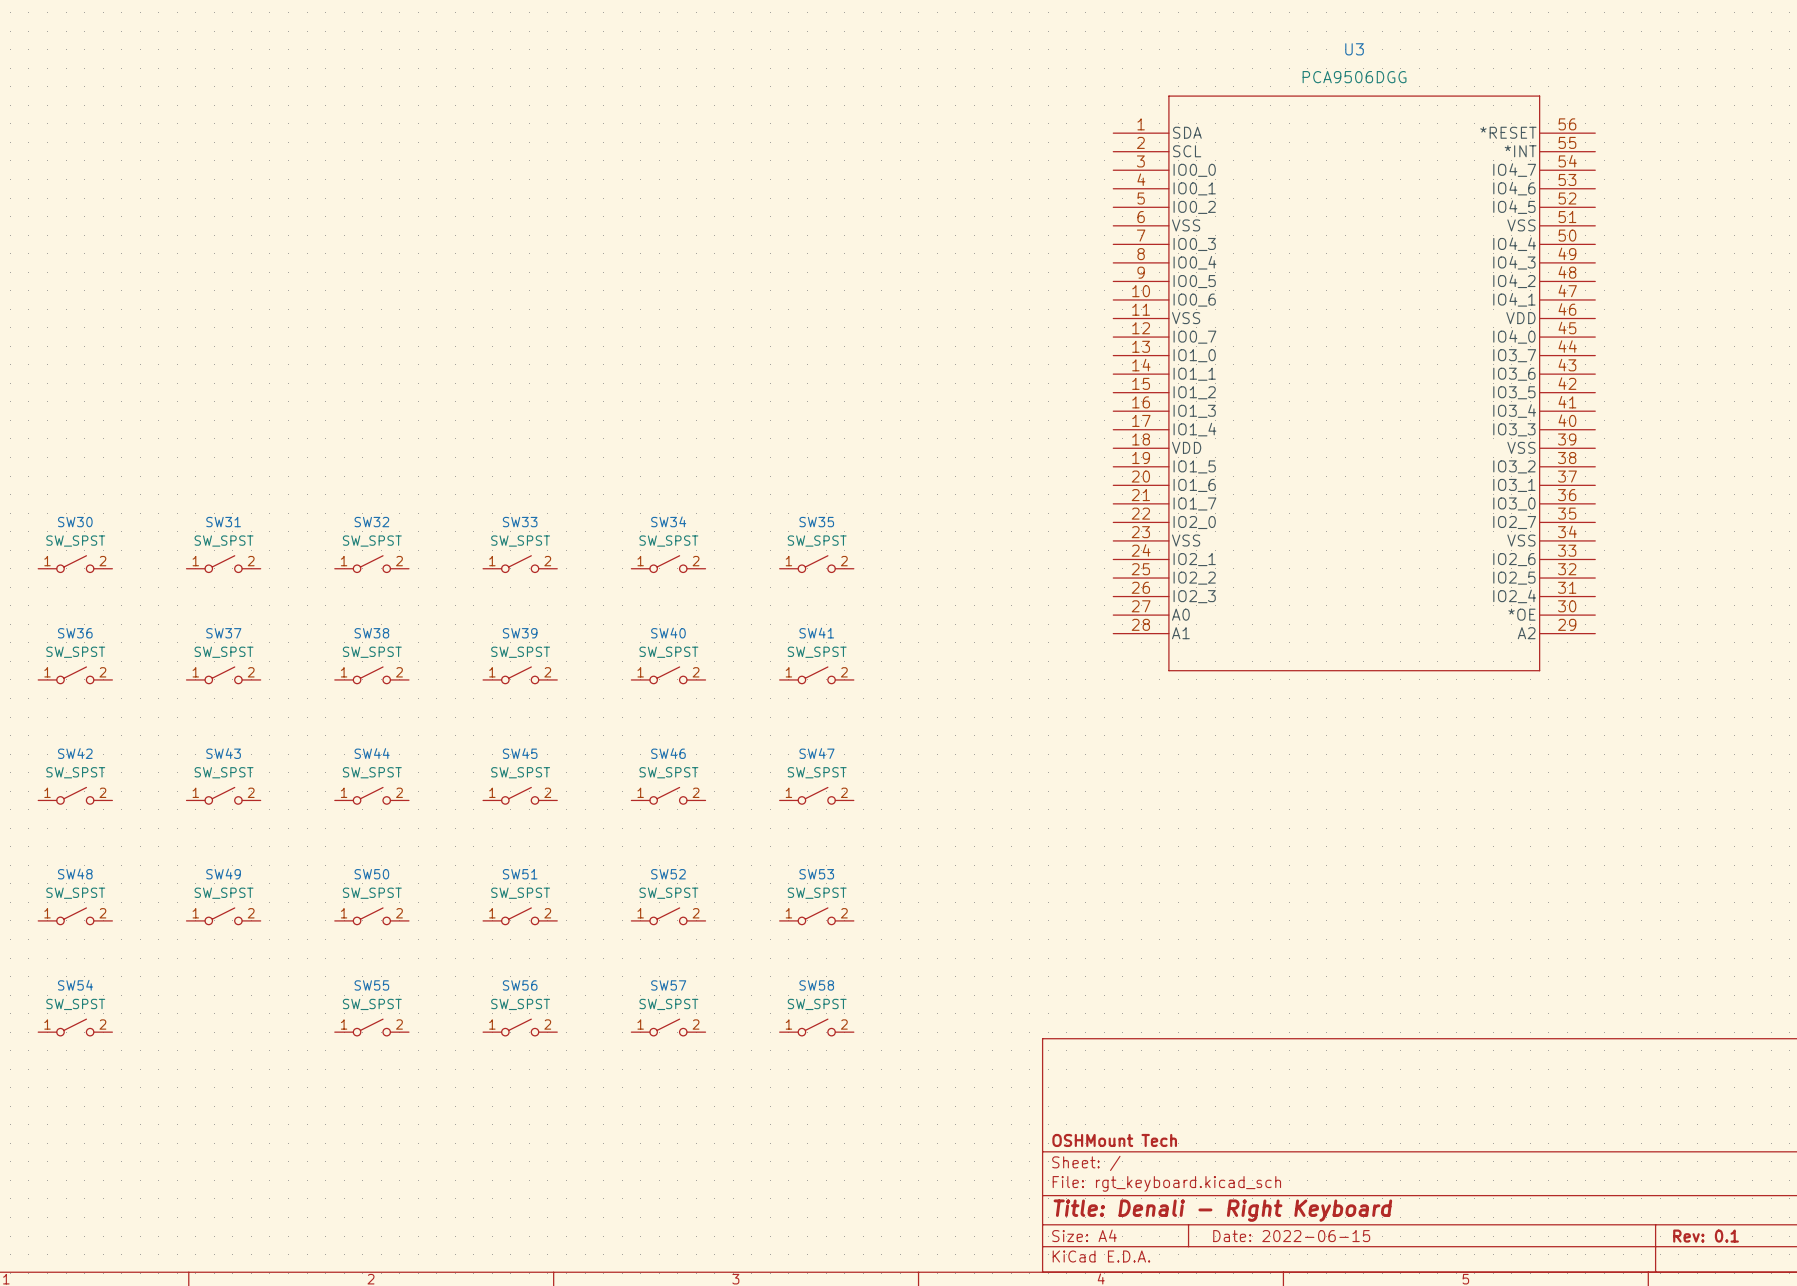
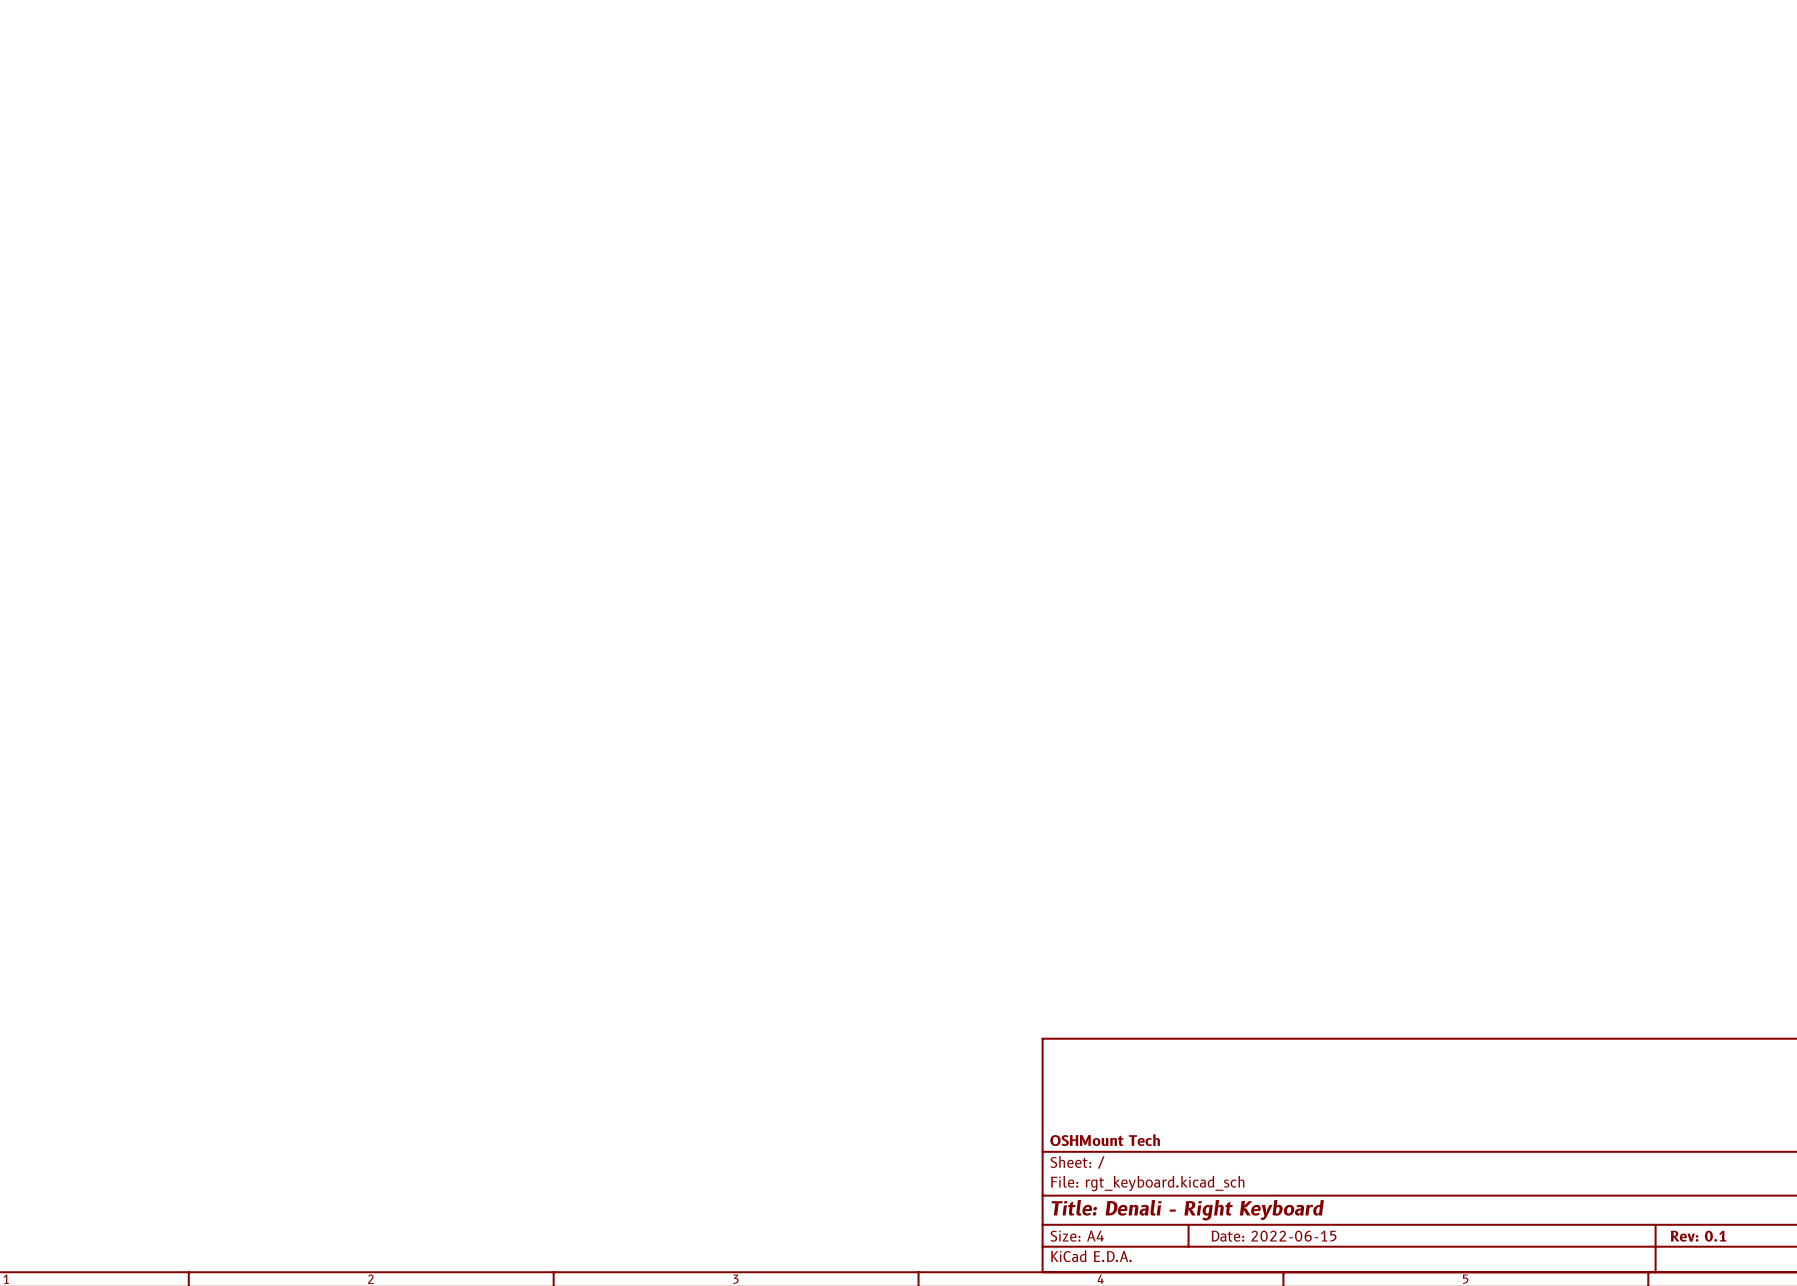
U3: PCA9506DGG (1354, 383) -> none
SW30: SW_SPST (75, 564) -> none
SW31: SW_SPST (223, 564) -> none
SW32: SW_SPST (371, 564) -> none
SW33: SW_SPST (520, 564) -> none
SW34: SW_SPST (668, 564) -> none
SW35: SW_SPST (816, 564) -> none
SW36: SW_SPST (75, 675) -> none
SW37: SW_SPST (223, 675) -> none
SW38: SW_SPST (371, 675) -> none
SW39: SW_SPST (520, 675) -> none
SW40: SW_SPST (668, 675) -> none
SW41: SW_SPST (816, 675) -> none
SW42: SW_SPST (75, 795) -> none
SW43: SW_SPST (223, 795) -> none
SW44: SW_SPST (371, 795) -> none
SW45: SW_SPST (520, 795) -> none
SW46: SW_SPST (668, 795) -> none
SW47: SW_SPST (816, 795) -> none
SW48: SW_SPST (75, 916) -> none
SW49: SW_SPST (223, 916) -> none
SW50: SW_SPST (371, 916) -> none
SW51: SW_SPST (520, 916) -> none
SW52: SW_SPST (668, 916) -> none
SW53: SW_SPST (816, 916) -> none
SW54: SW_SPST (75, 1027) -> none
SW55: SW_SPST (371, 1027) -> none
SW56: SW_SPST (520, 1027) -> none
SW57: SW_SPST (668, 1027) -> none
SW58: SW_SPST (816, 1027) -> none

